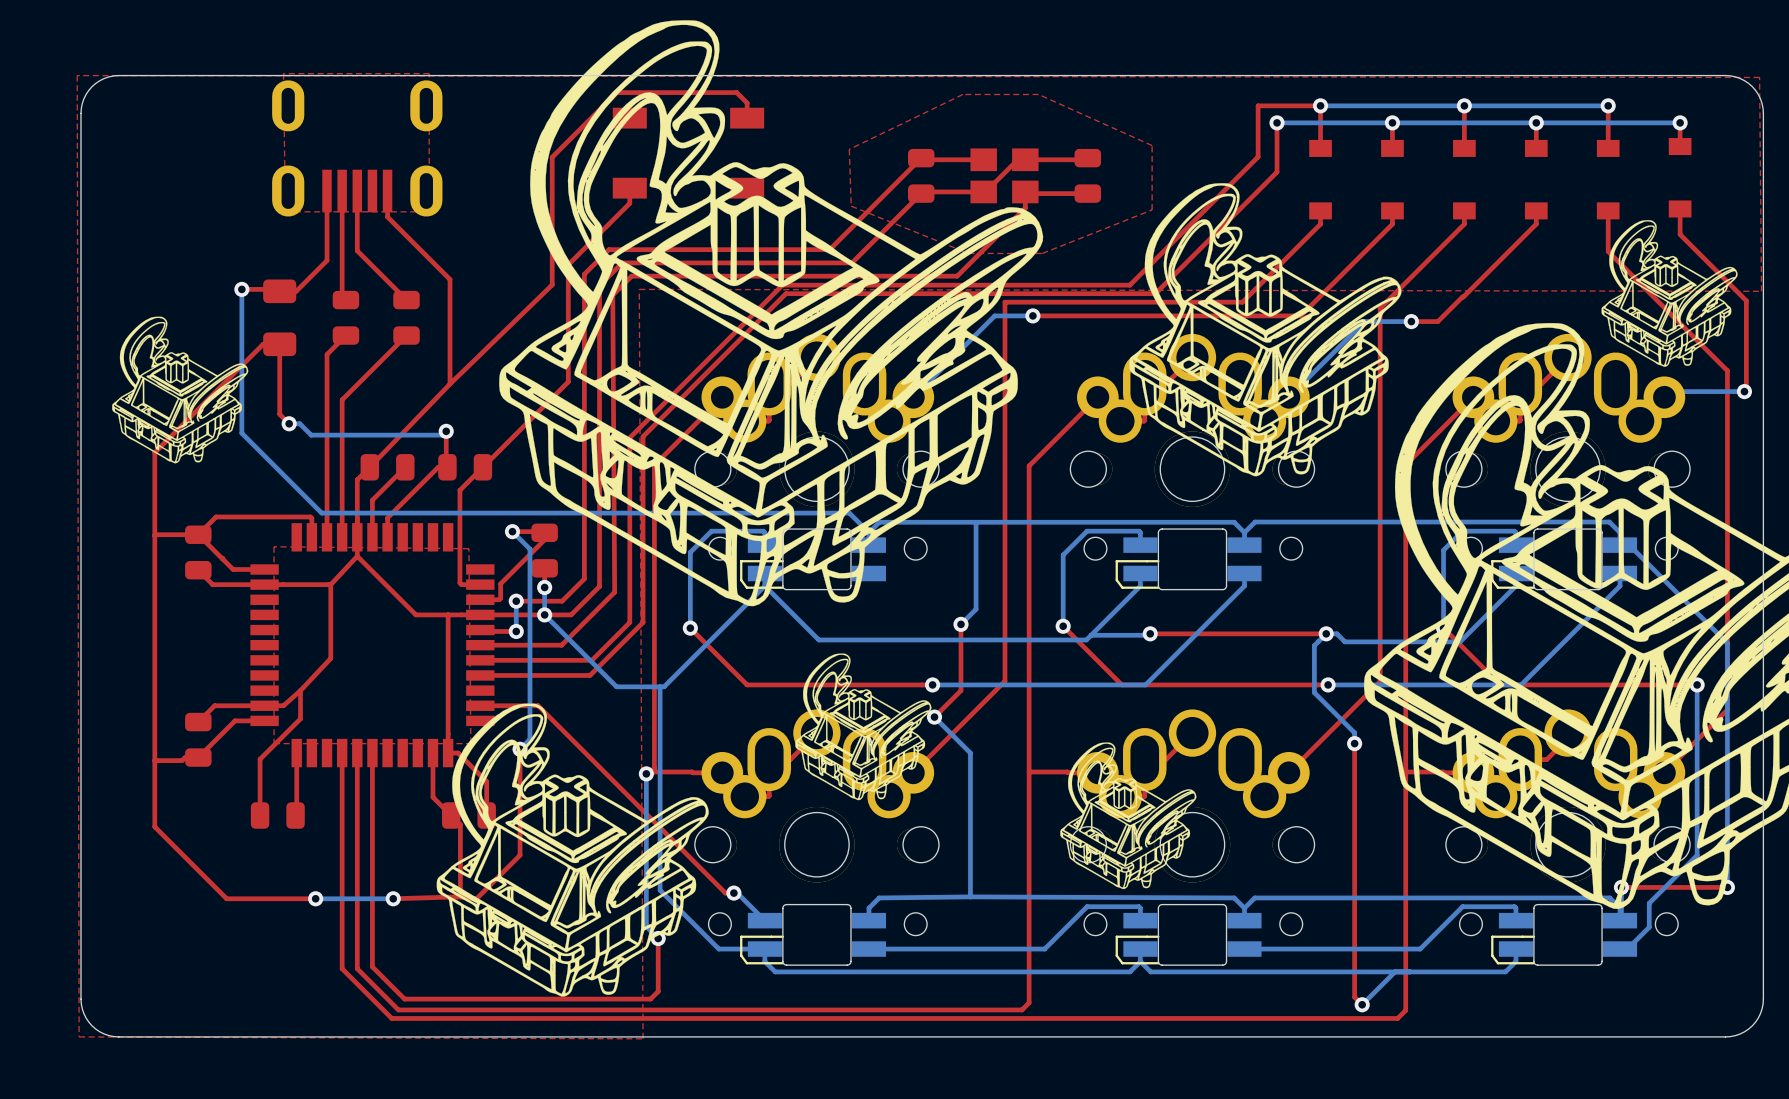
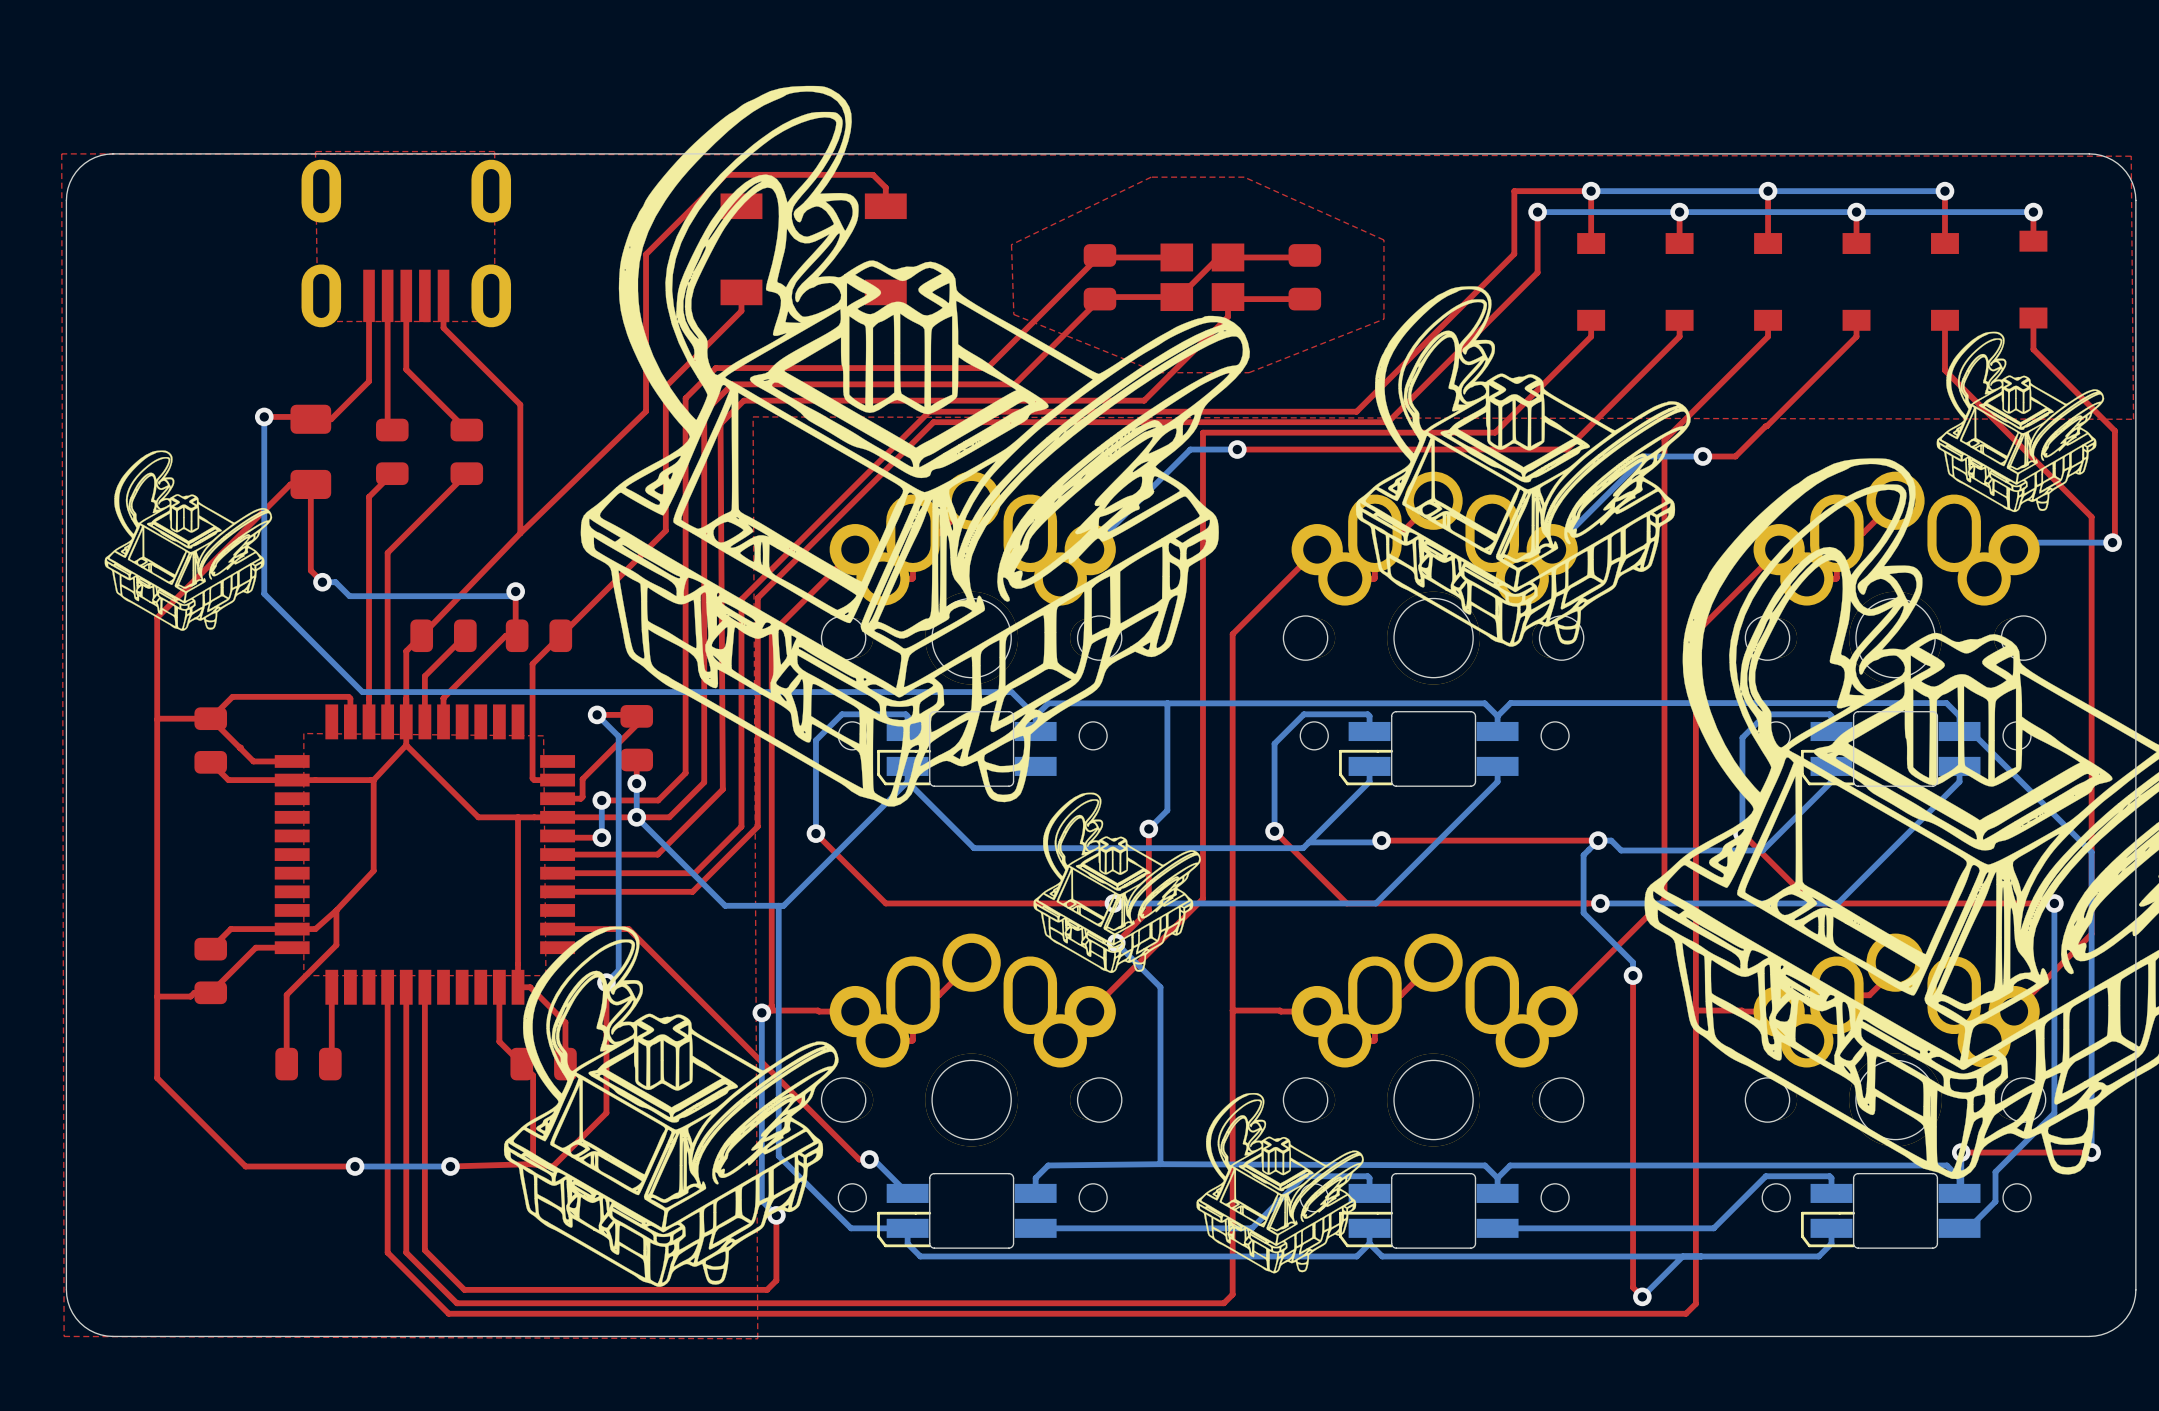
drawing position: (863, 726) -> (1117, 882)
drawing position: (1128, 815) -> (1280, 1183)

